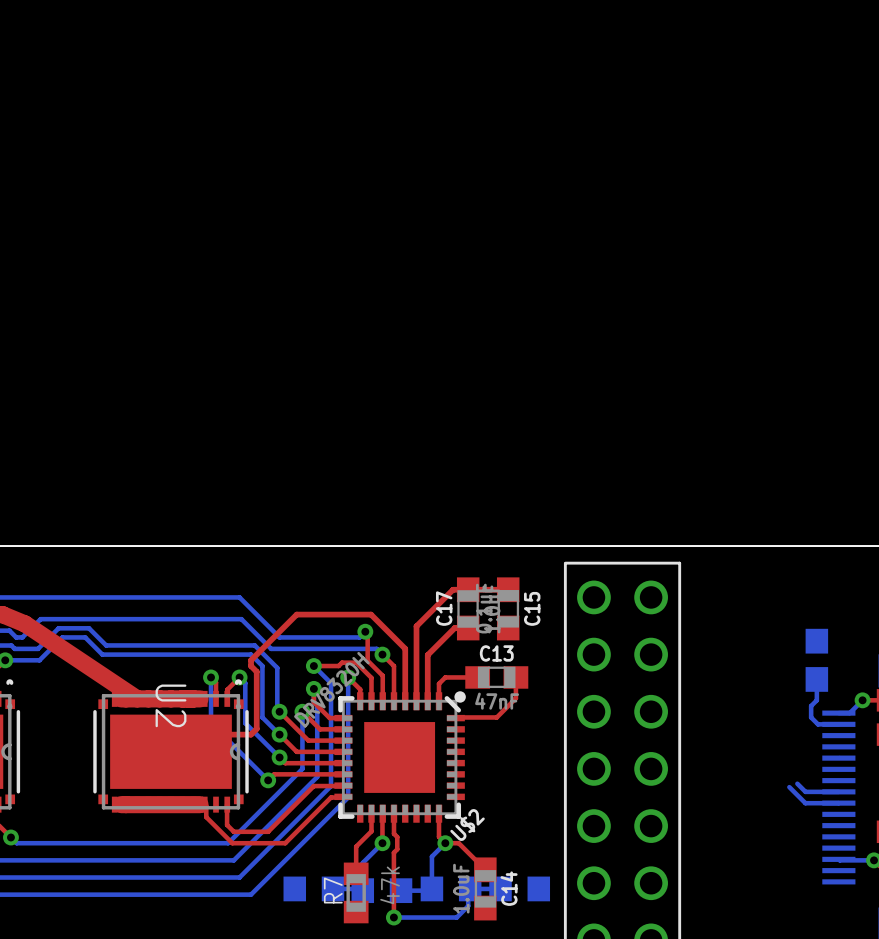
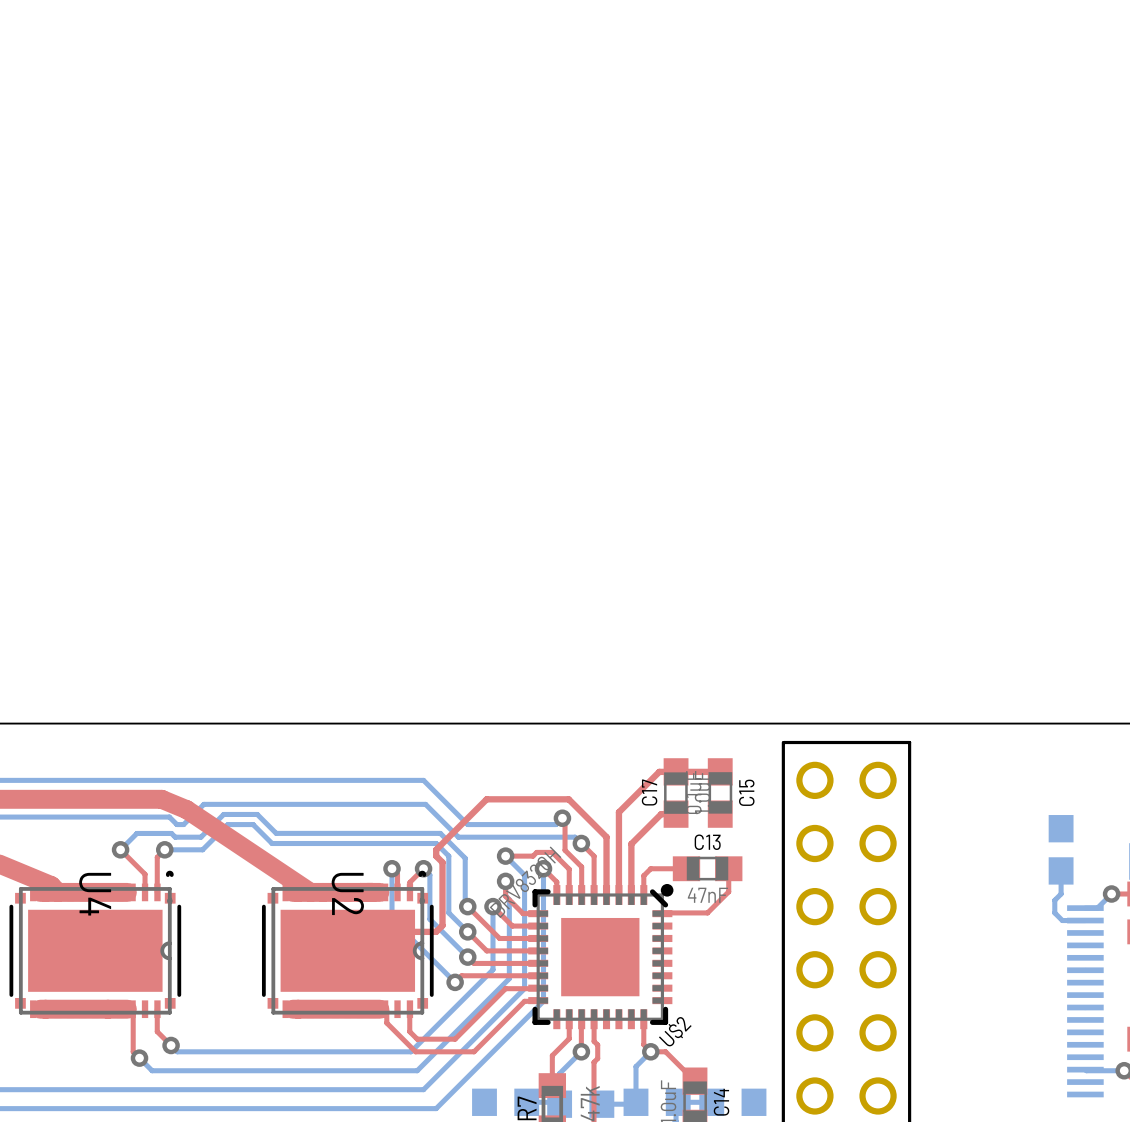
bottom track: (797, 783) (805, 791) (838, 791) -> none
bottom track: (789, 787) (805, 803) (838, 803) -> none

